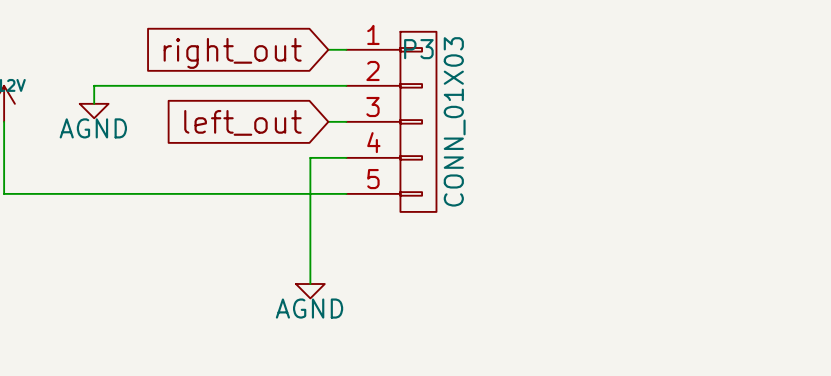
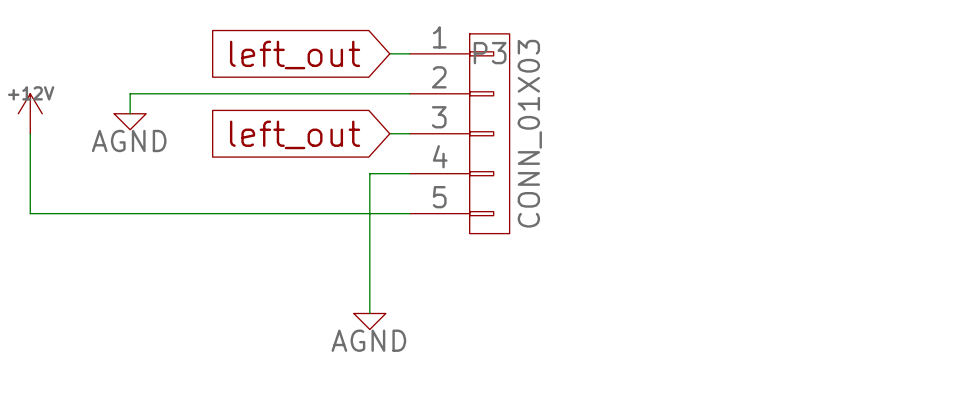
global label: right_out (232, 53) -> left_out (295, 55)

